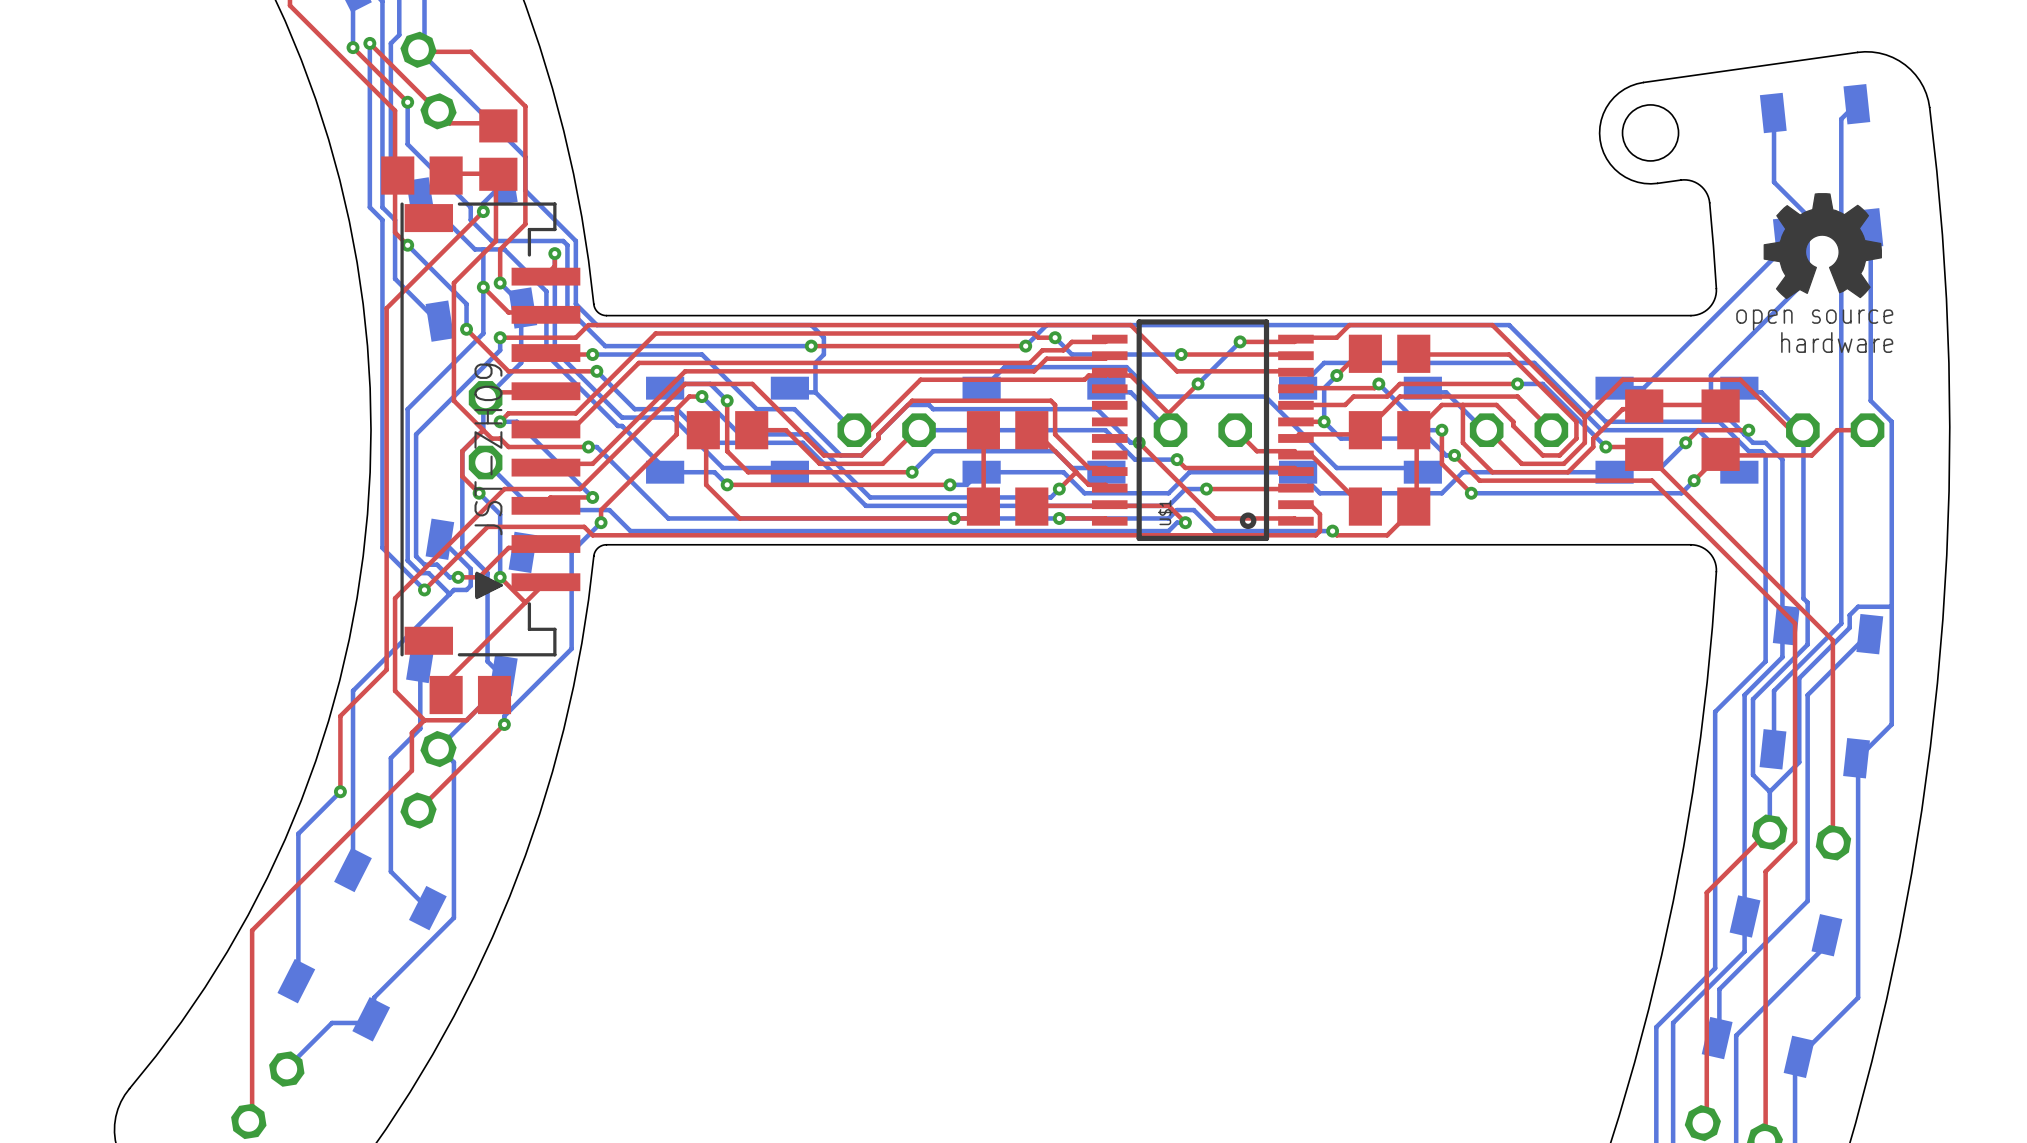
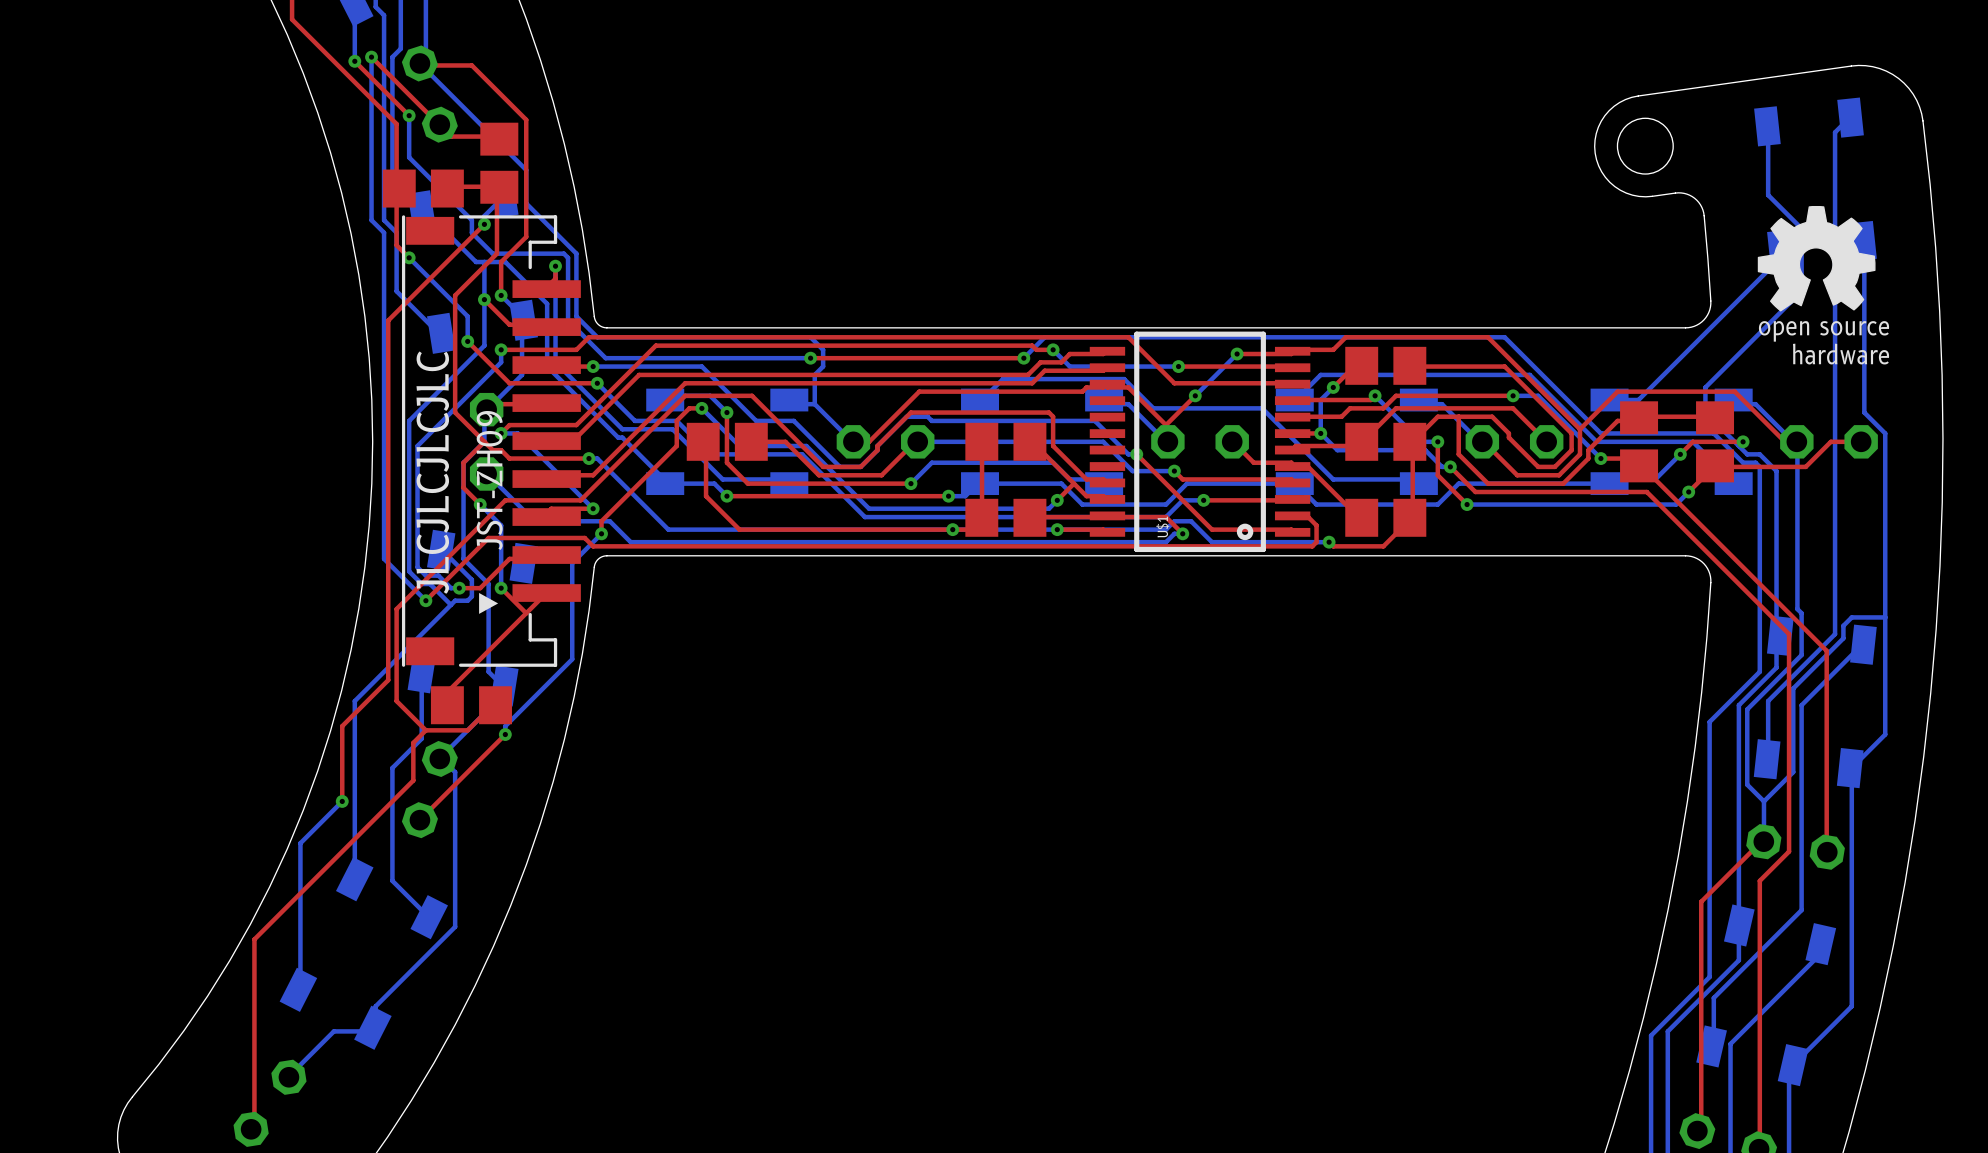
text: none -> JLCJLCJLCJLC (432, 472)

